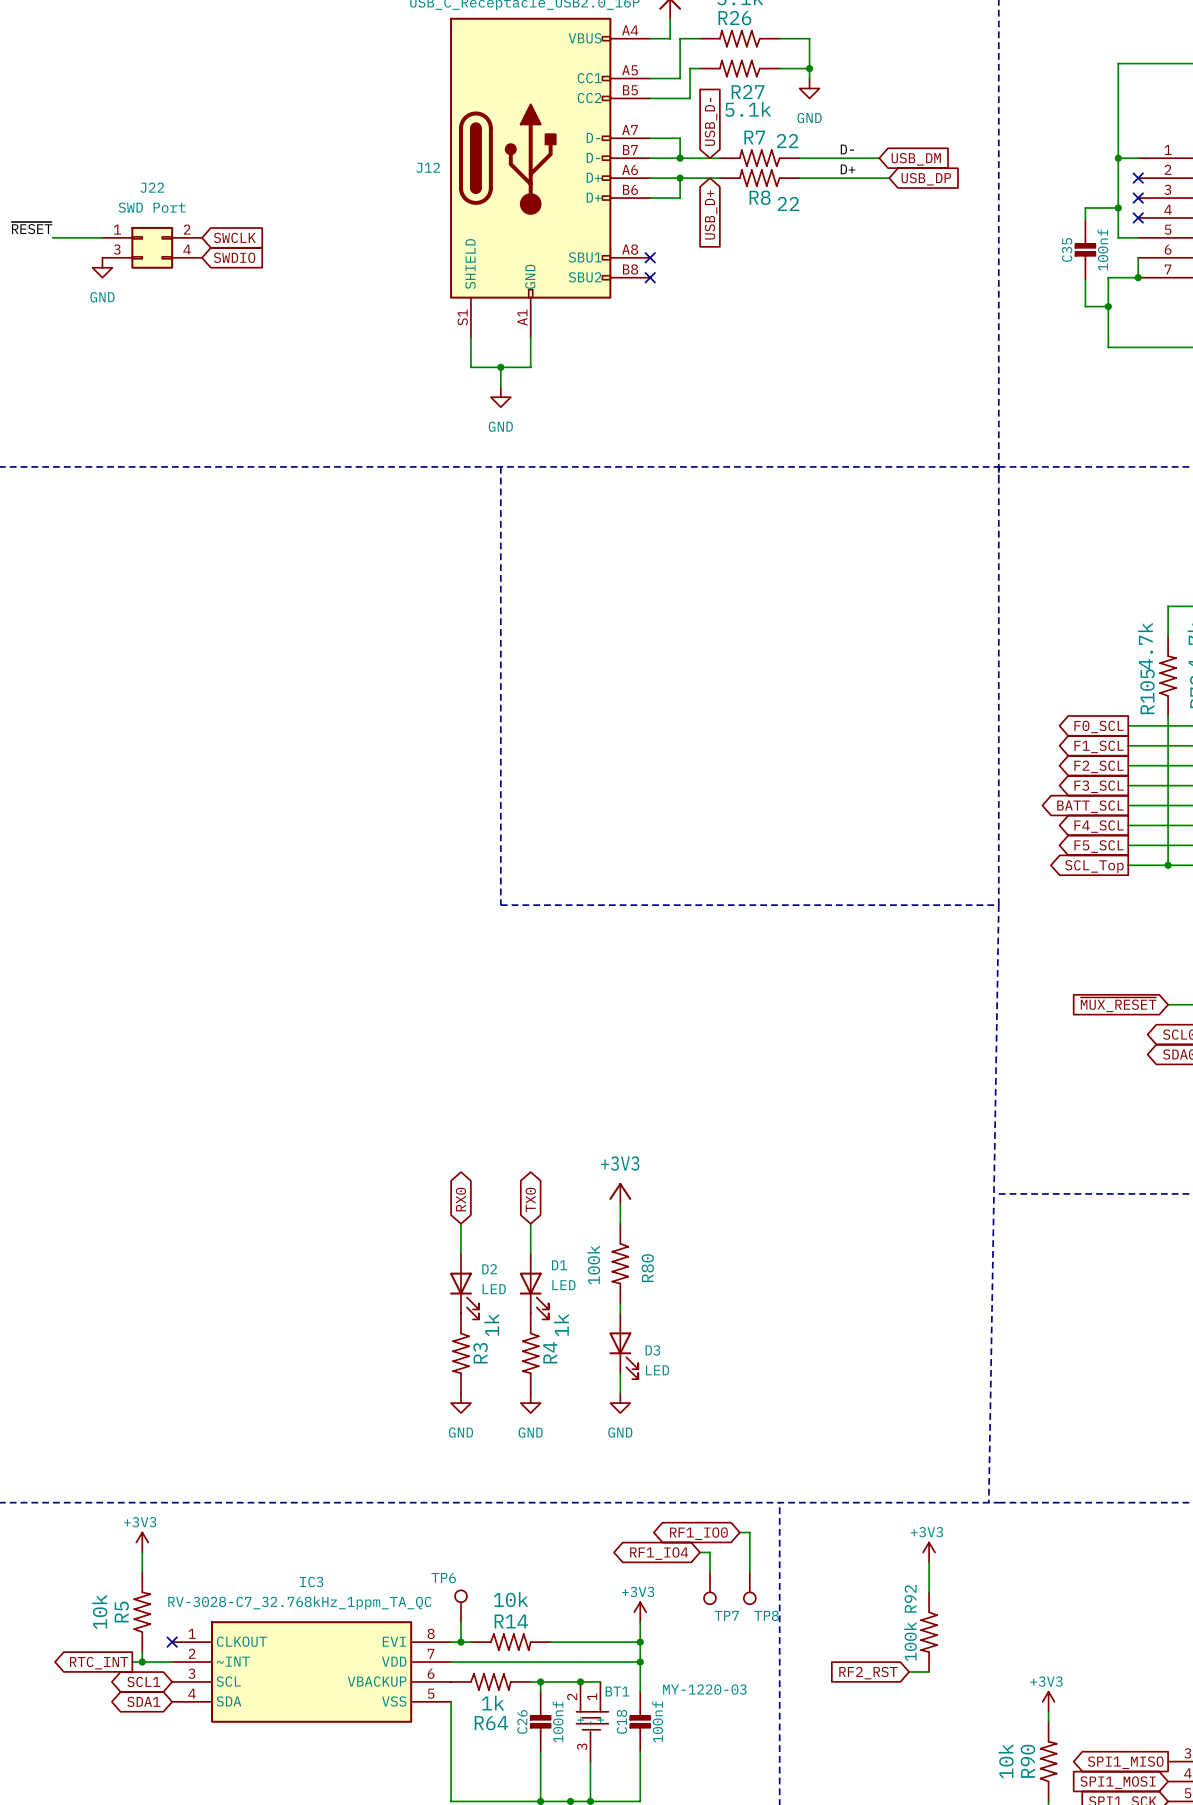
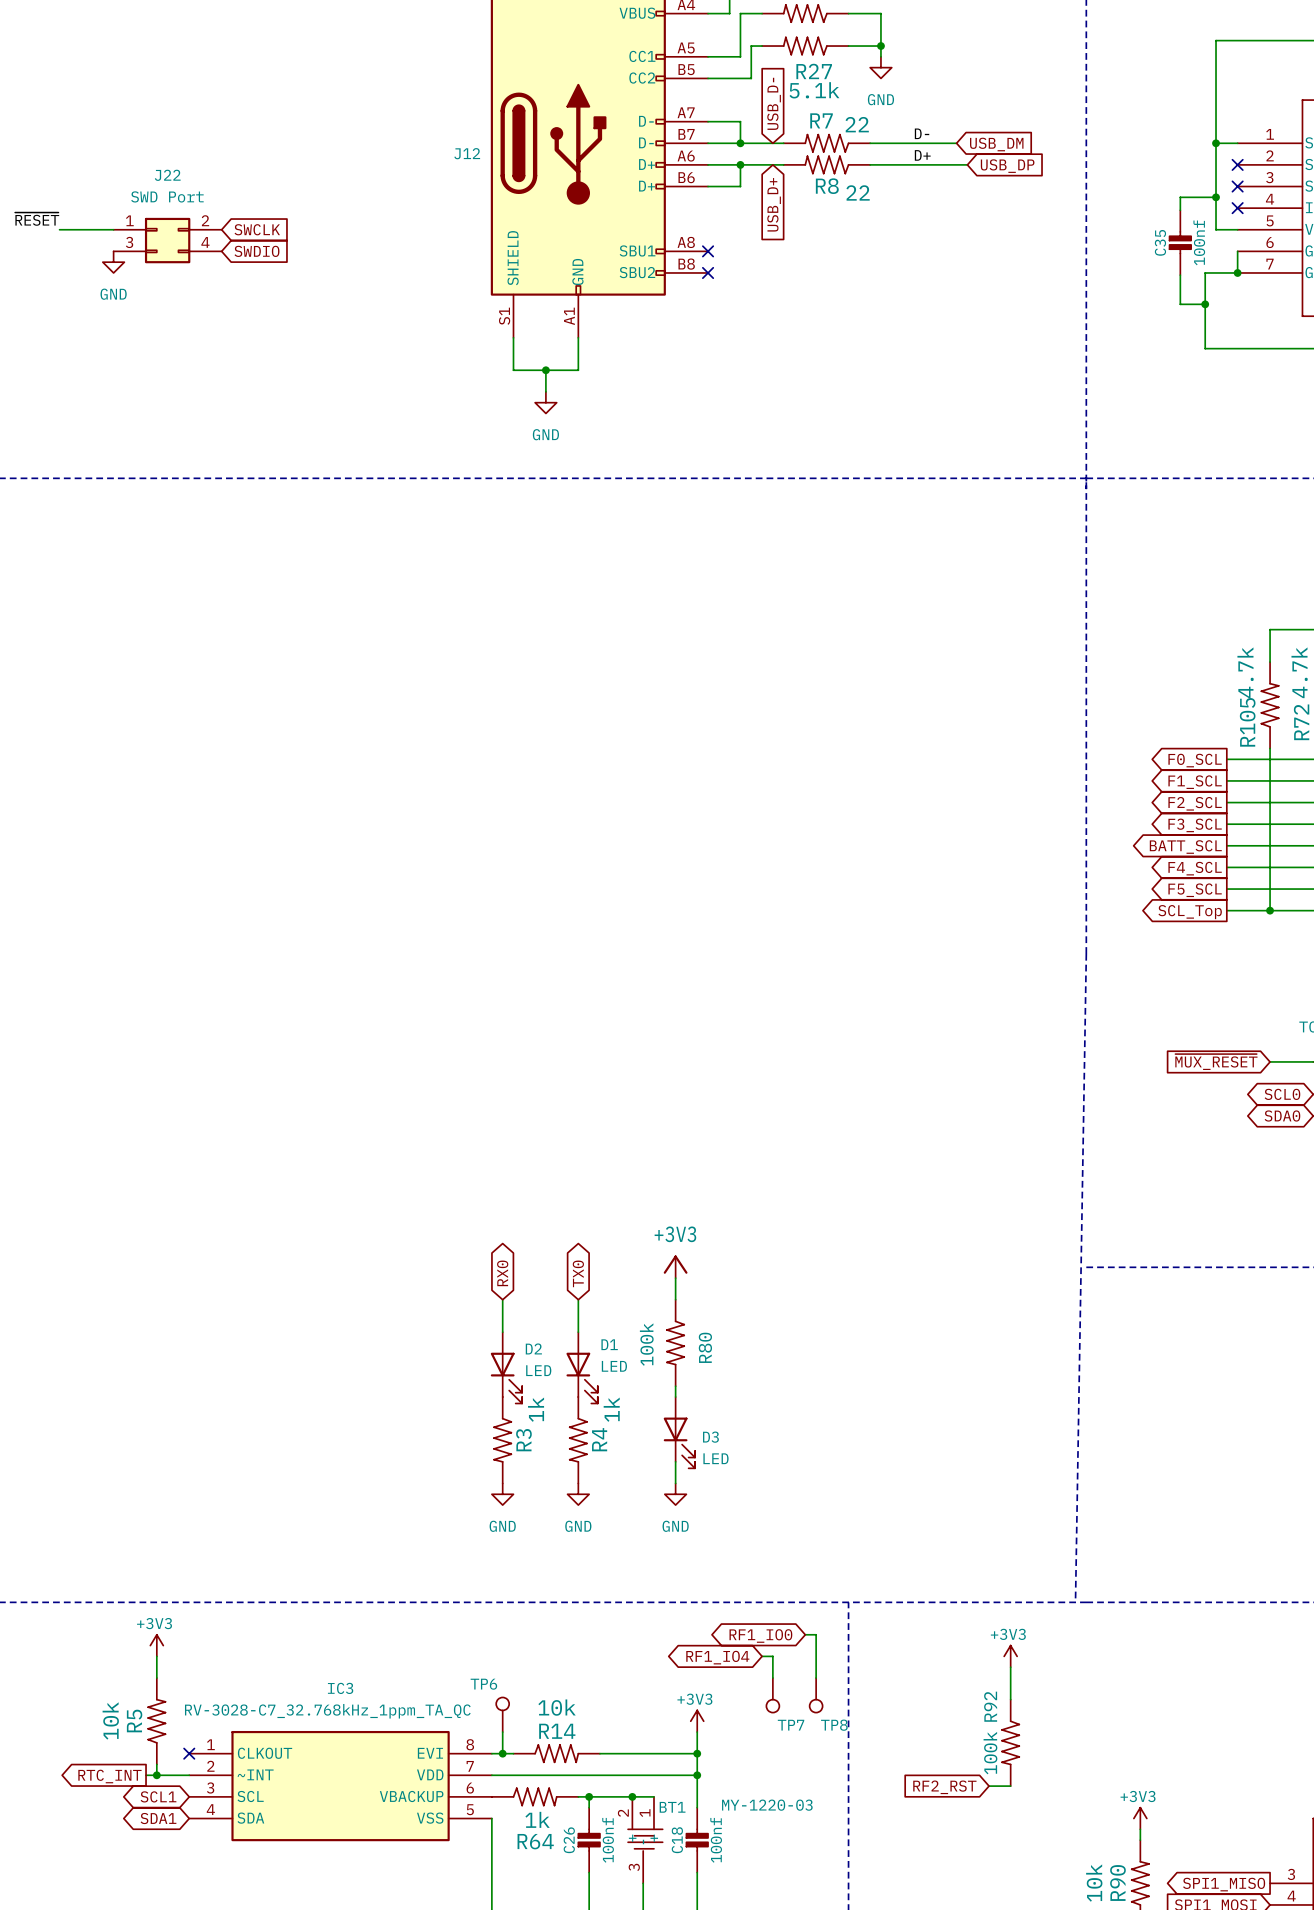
line: (500, 466) (500, 905) (998, 905) -> none

